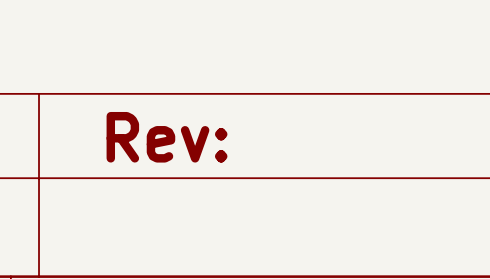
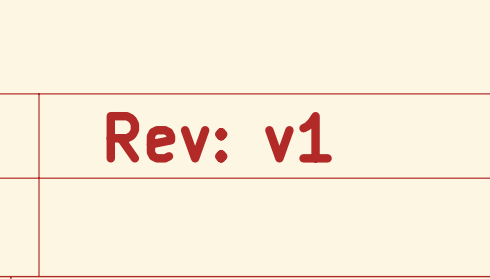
title block: Rev: (167, 137) -> Rev: v1 (219, 137)

